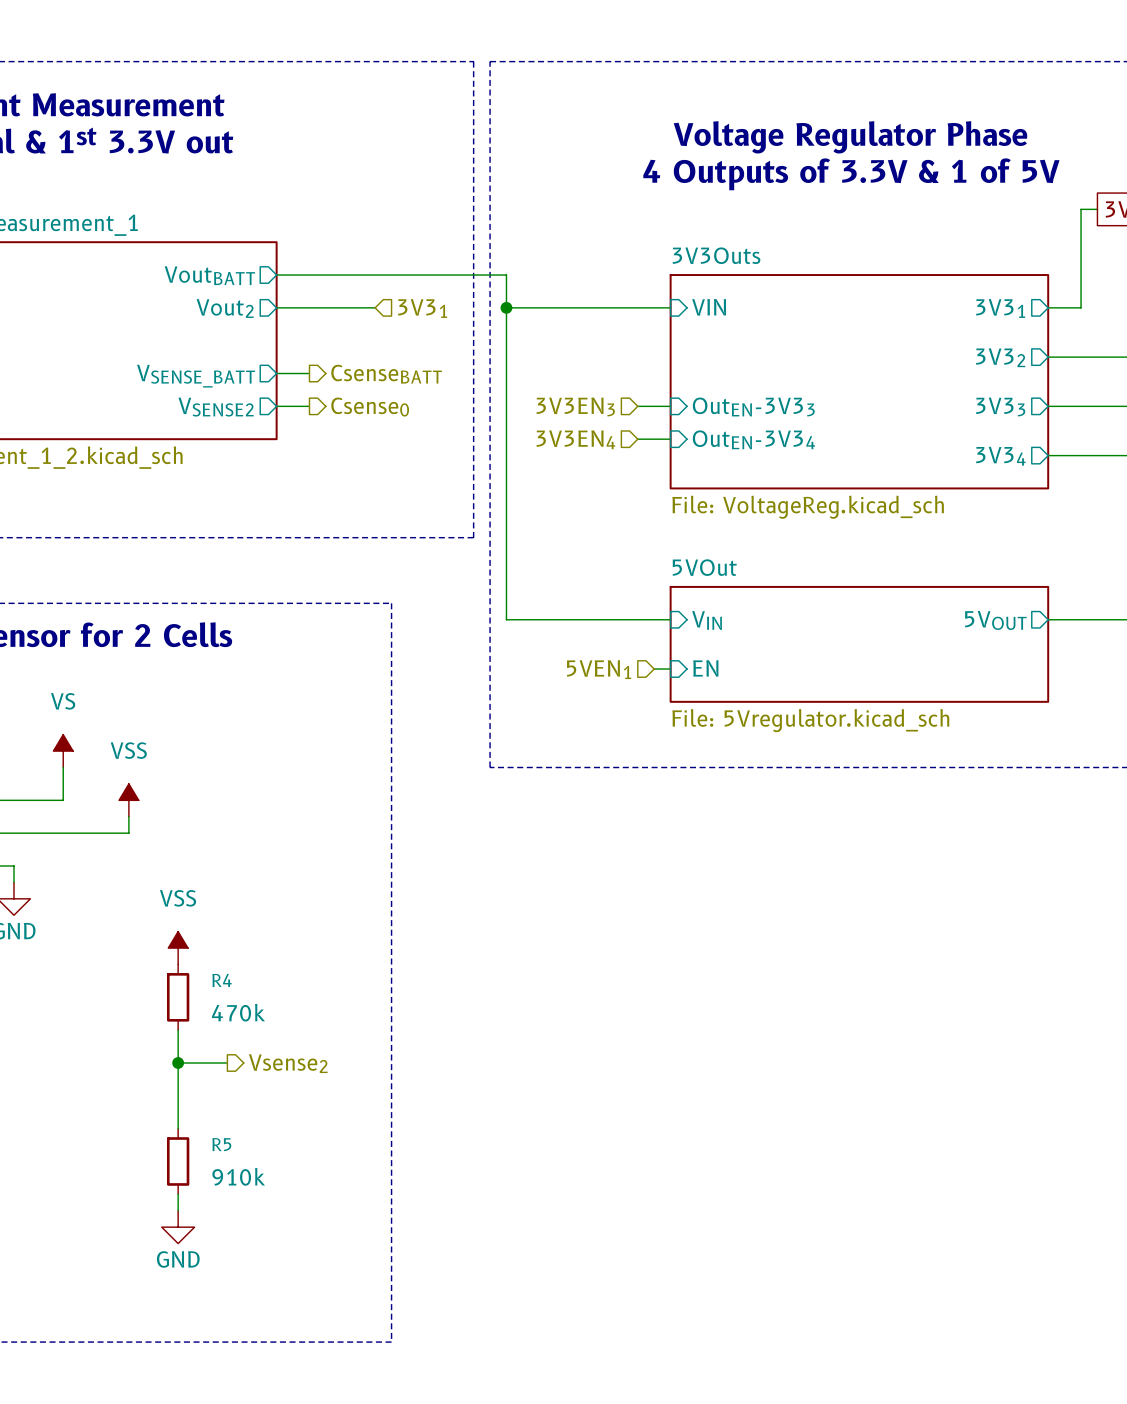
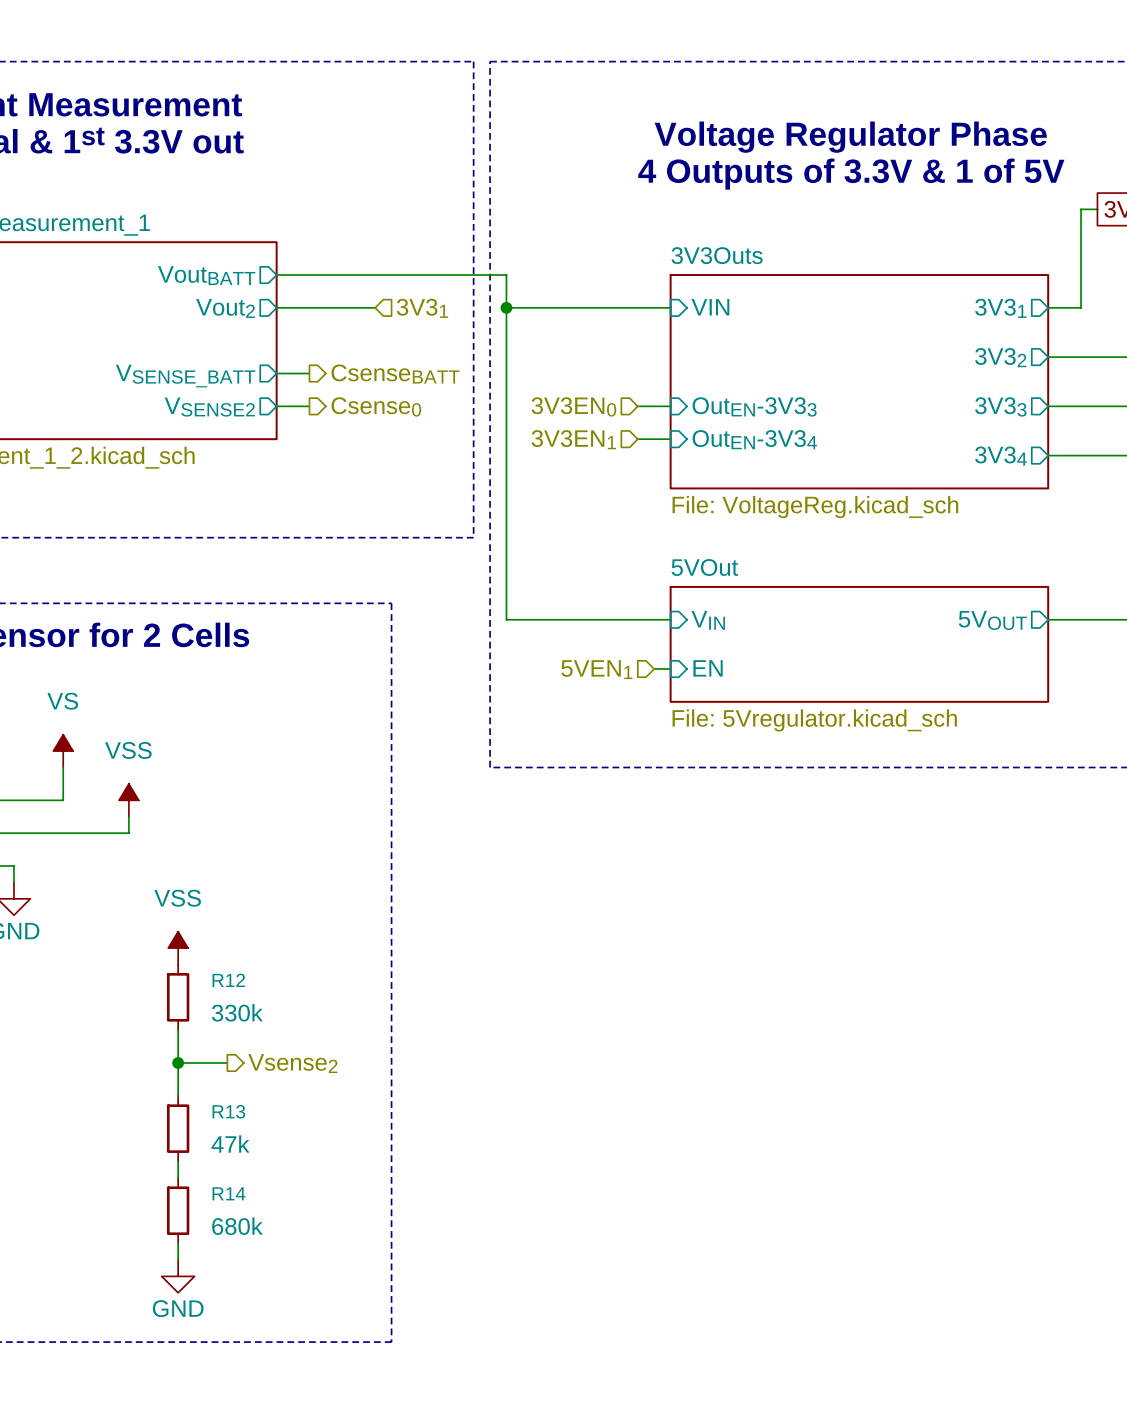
hierarchical label: 3V3EN3 (575, 406) -> 3V3EN0 (573, 406)
hierarchical label: 3V3EN4 (575, 439) -> 3V3EN1 (573, 439)
R4 name: R4 (222, 980) -> R12 (228, 980)
R4 value: 470k (238, 1012) -> 330k (237, 1012)
wire: (178, 1095) (178, 1128) -> none
R13: none -> 47k (178, 1128)
R5: 910k (178, 1161) -> none
wire: (178, 1194) (178, 1210) -> (178, 1161) (178, 1177)
R14: none -> 680k (178, 1210)
power symbol position: GND (178, 1227) -> GND (178, 1276)
wire: none -> (178, 1243) (178, 1259)

